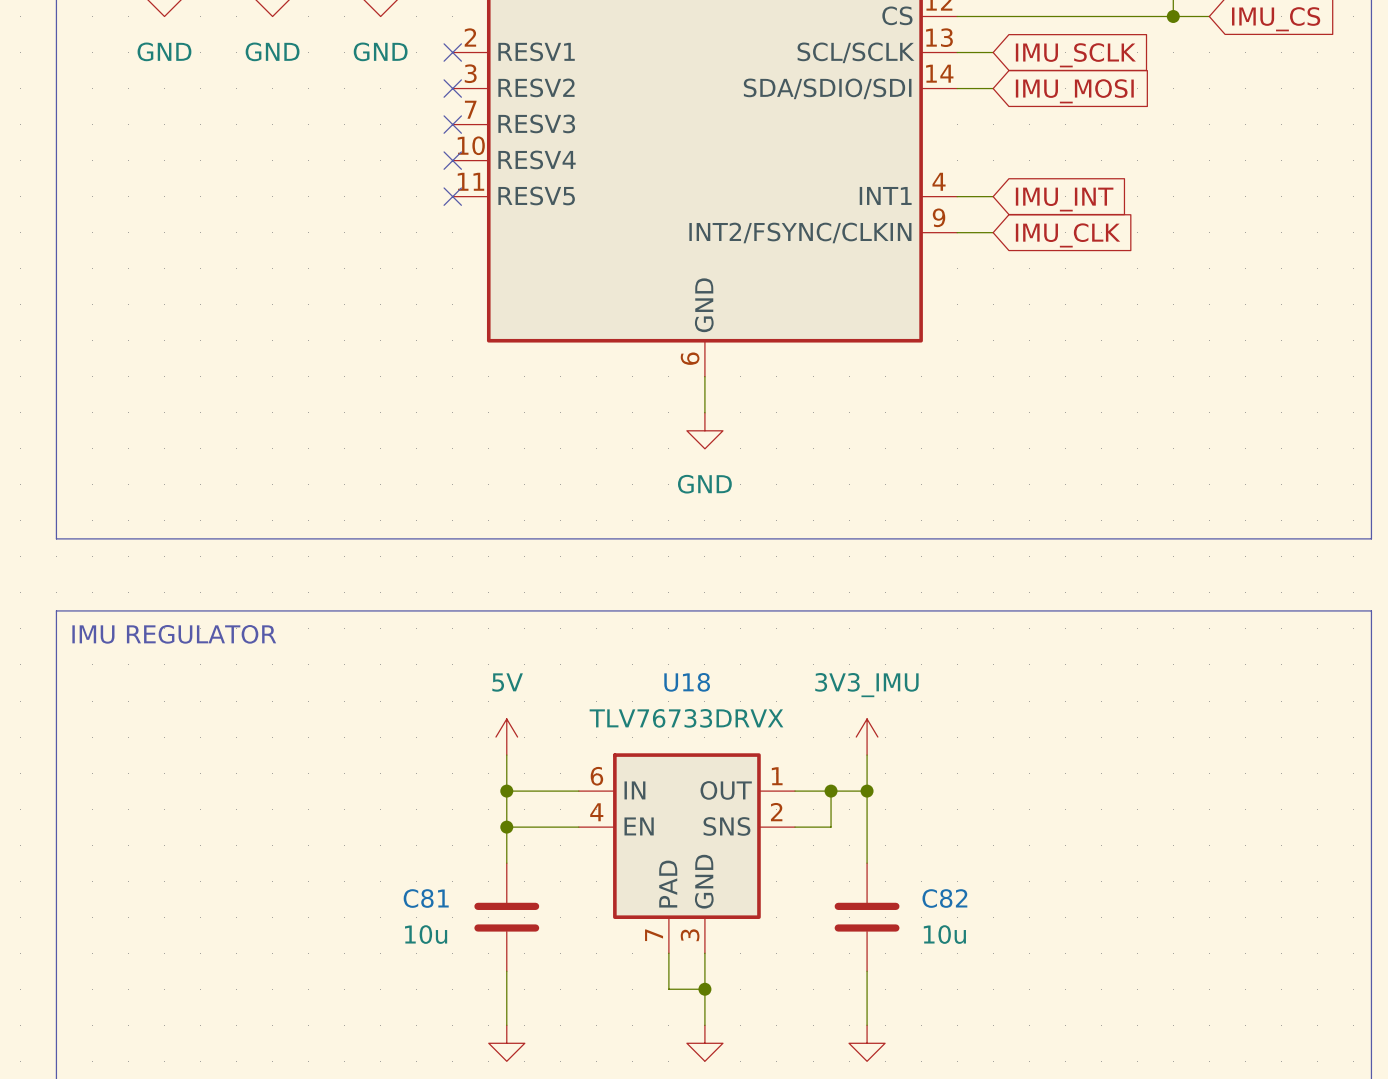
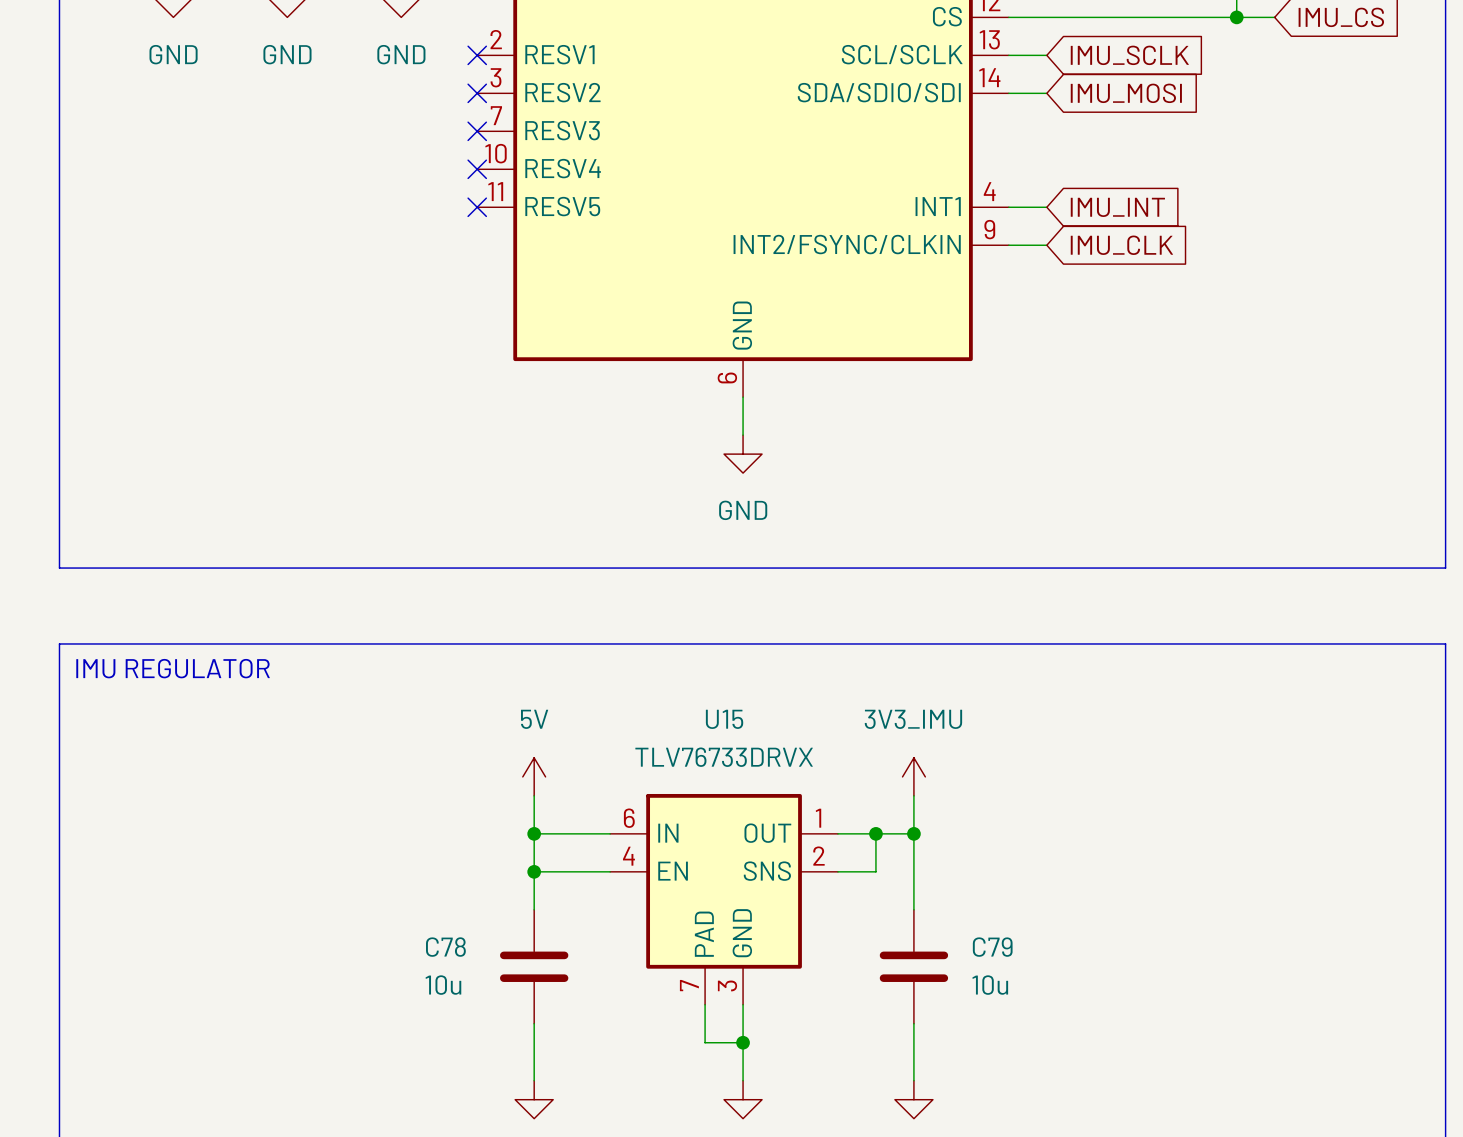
U18 name: U18 (687, 682) -> U15 (724, 719)
C81 name: C81 (426, 898) -> C78 (445, 947)
C82 name: C82 (944, 898) -> C79 (992, 947)

